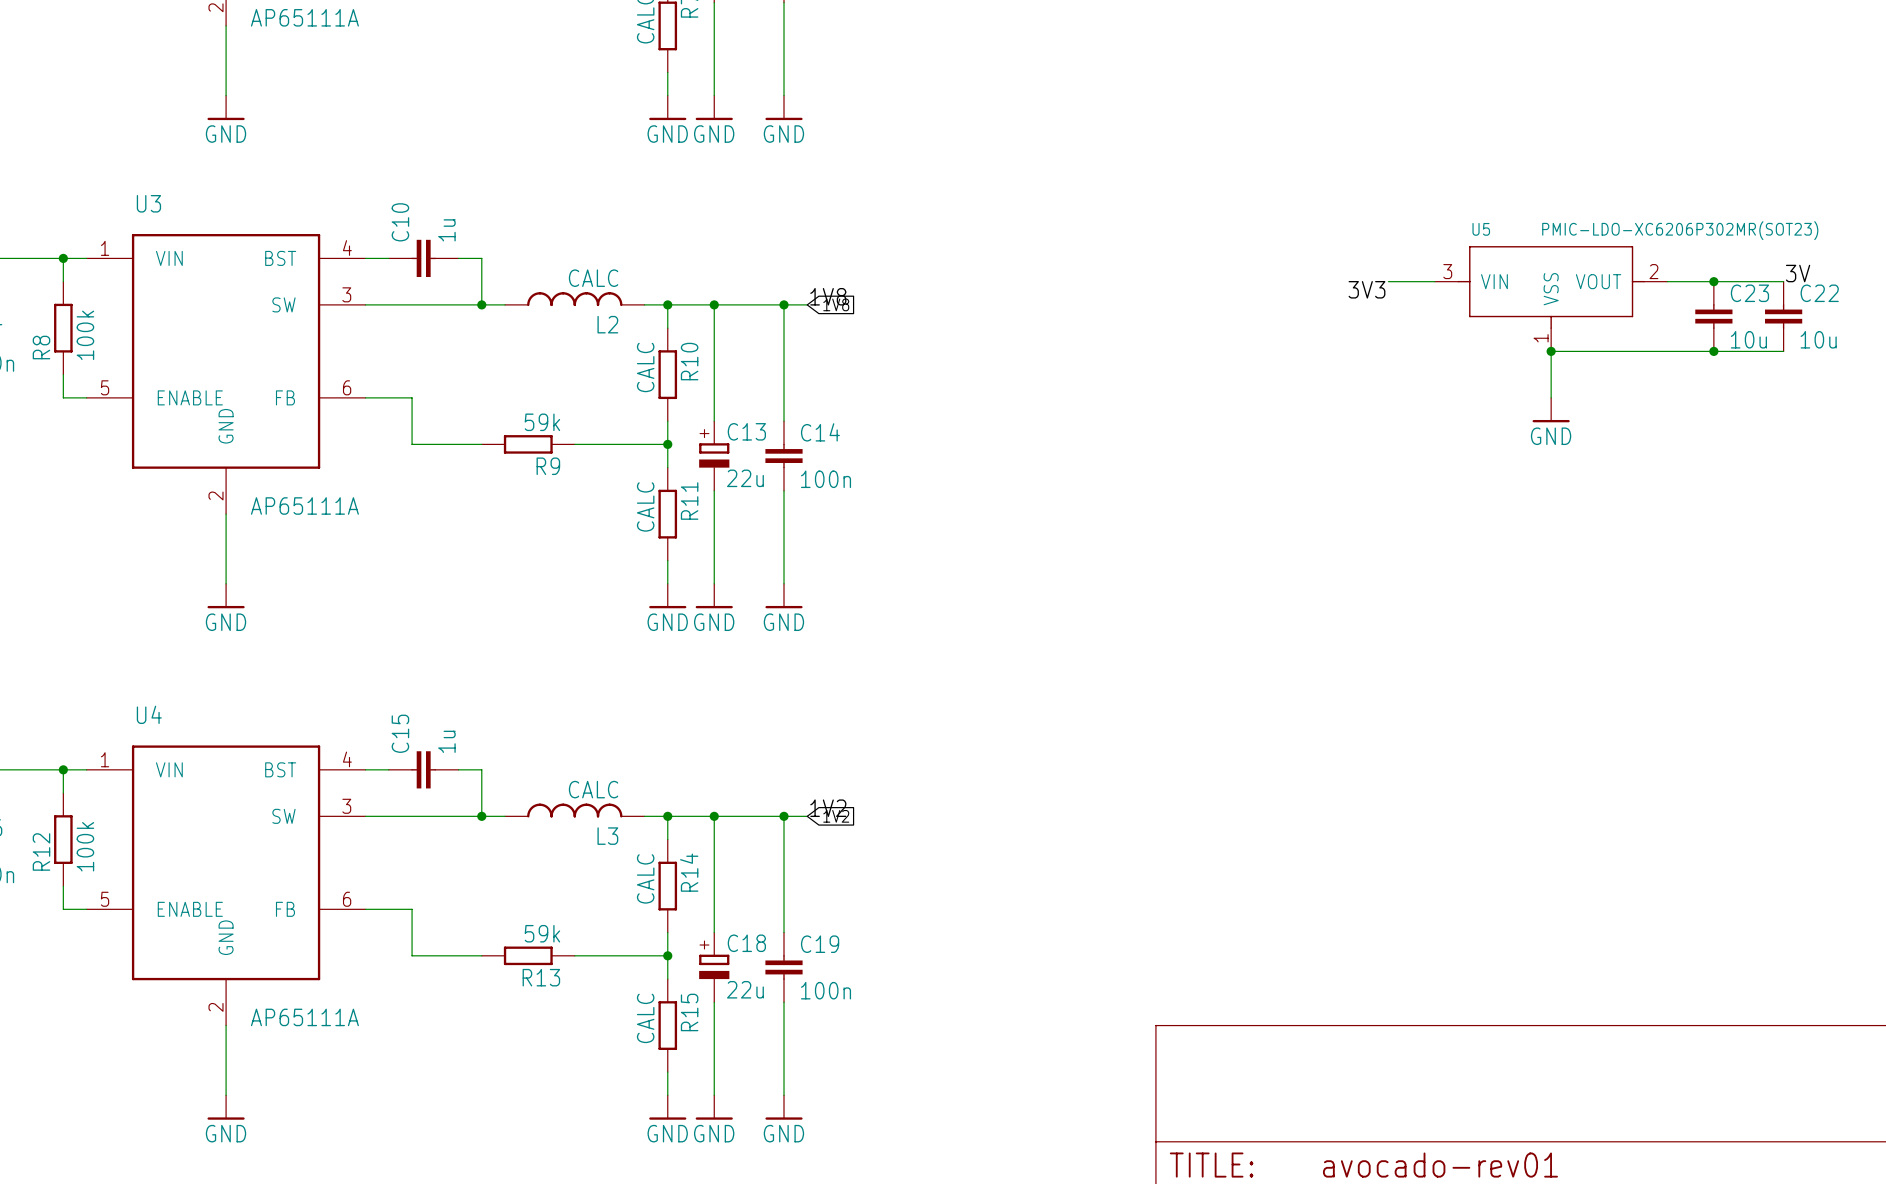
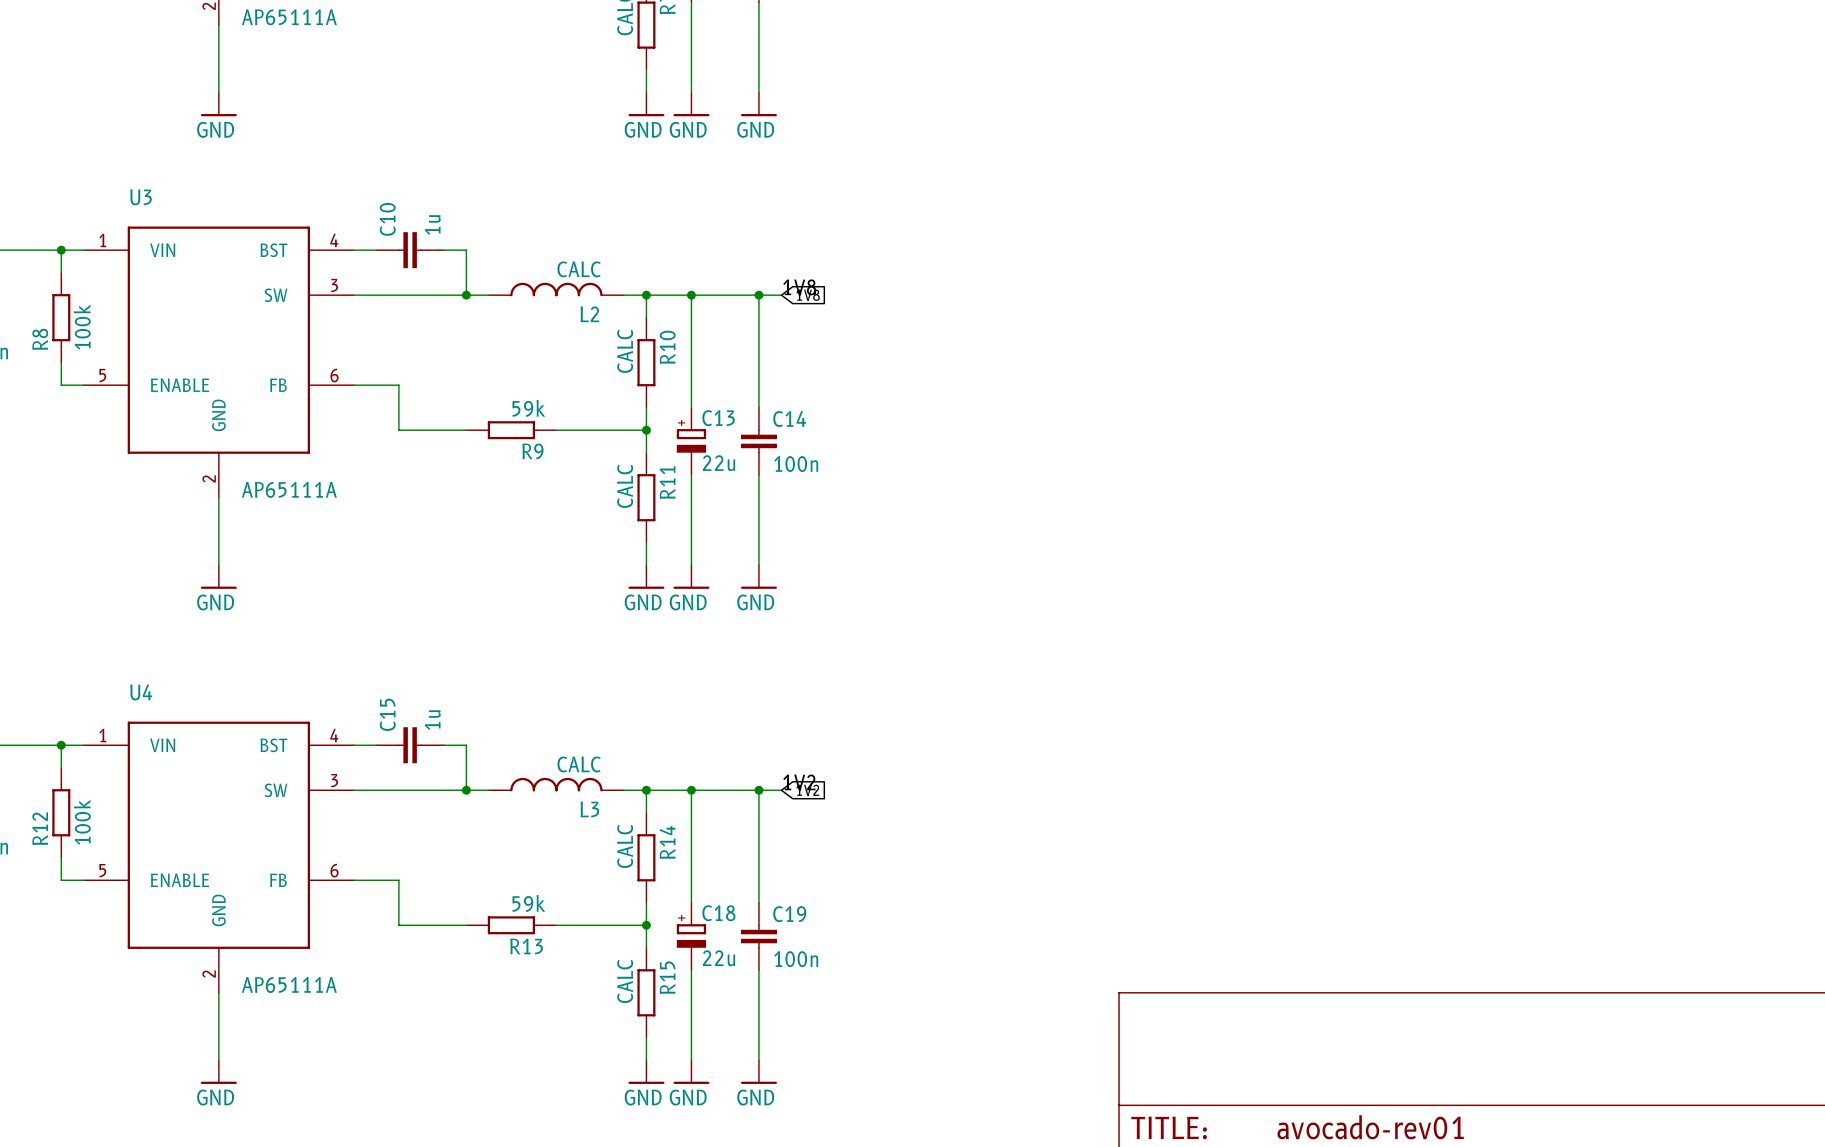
label: 3V (1798, 273) -> none
wire: (1388, 281) (1434, 281) -> none
wire: (1667, 281) (1783, 281) -> none
junction: (1713, 281) -> none
label: 3V3 (1366, 289) -> none
U5: PMIC-LDO-XC6206P302MR(SOT23) (1551, 298) -> none
C23: 10u (1713, 316) -> none
C22: 10u (1783, 316) -> none
junction: (1551, 351) -> none
junction: (1713, 351) -> none
wire: (1783, 351) (1551, 351) (1551, 397) -> none
power symbol: GND (1551, 410) -> none

